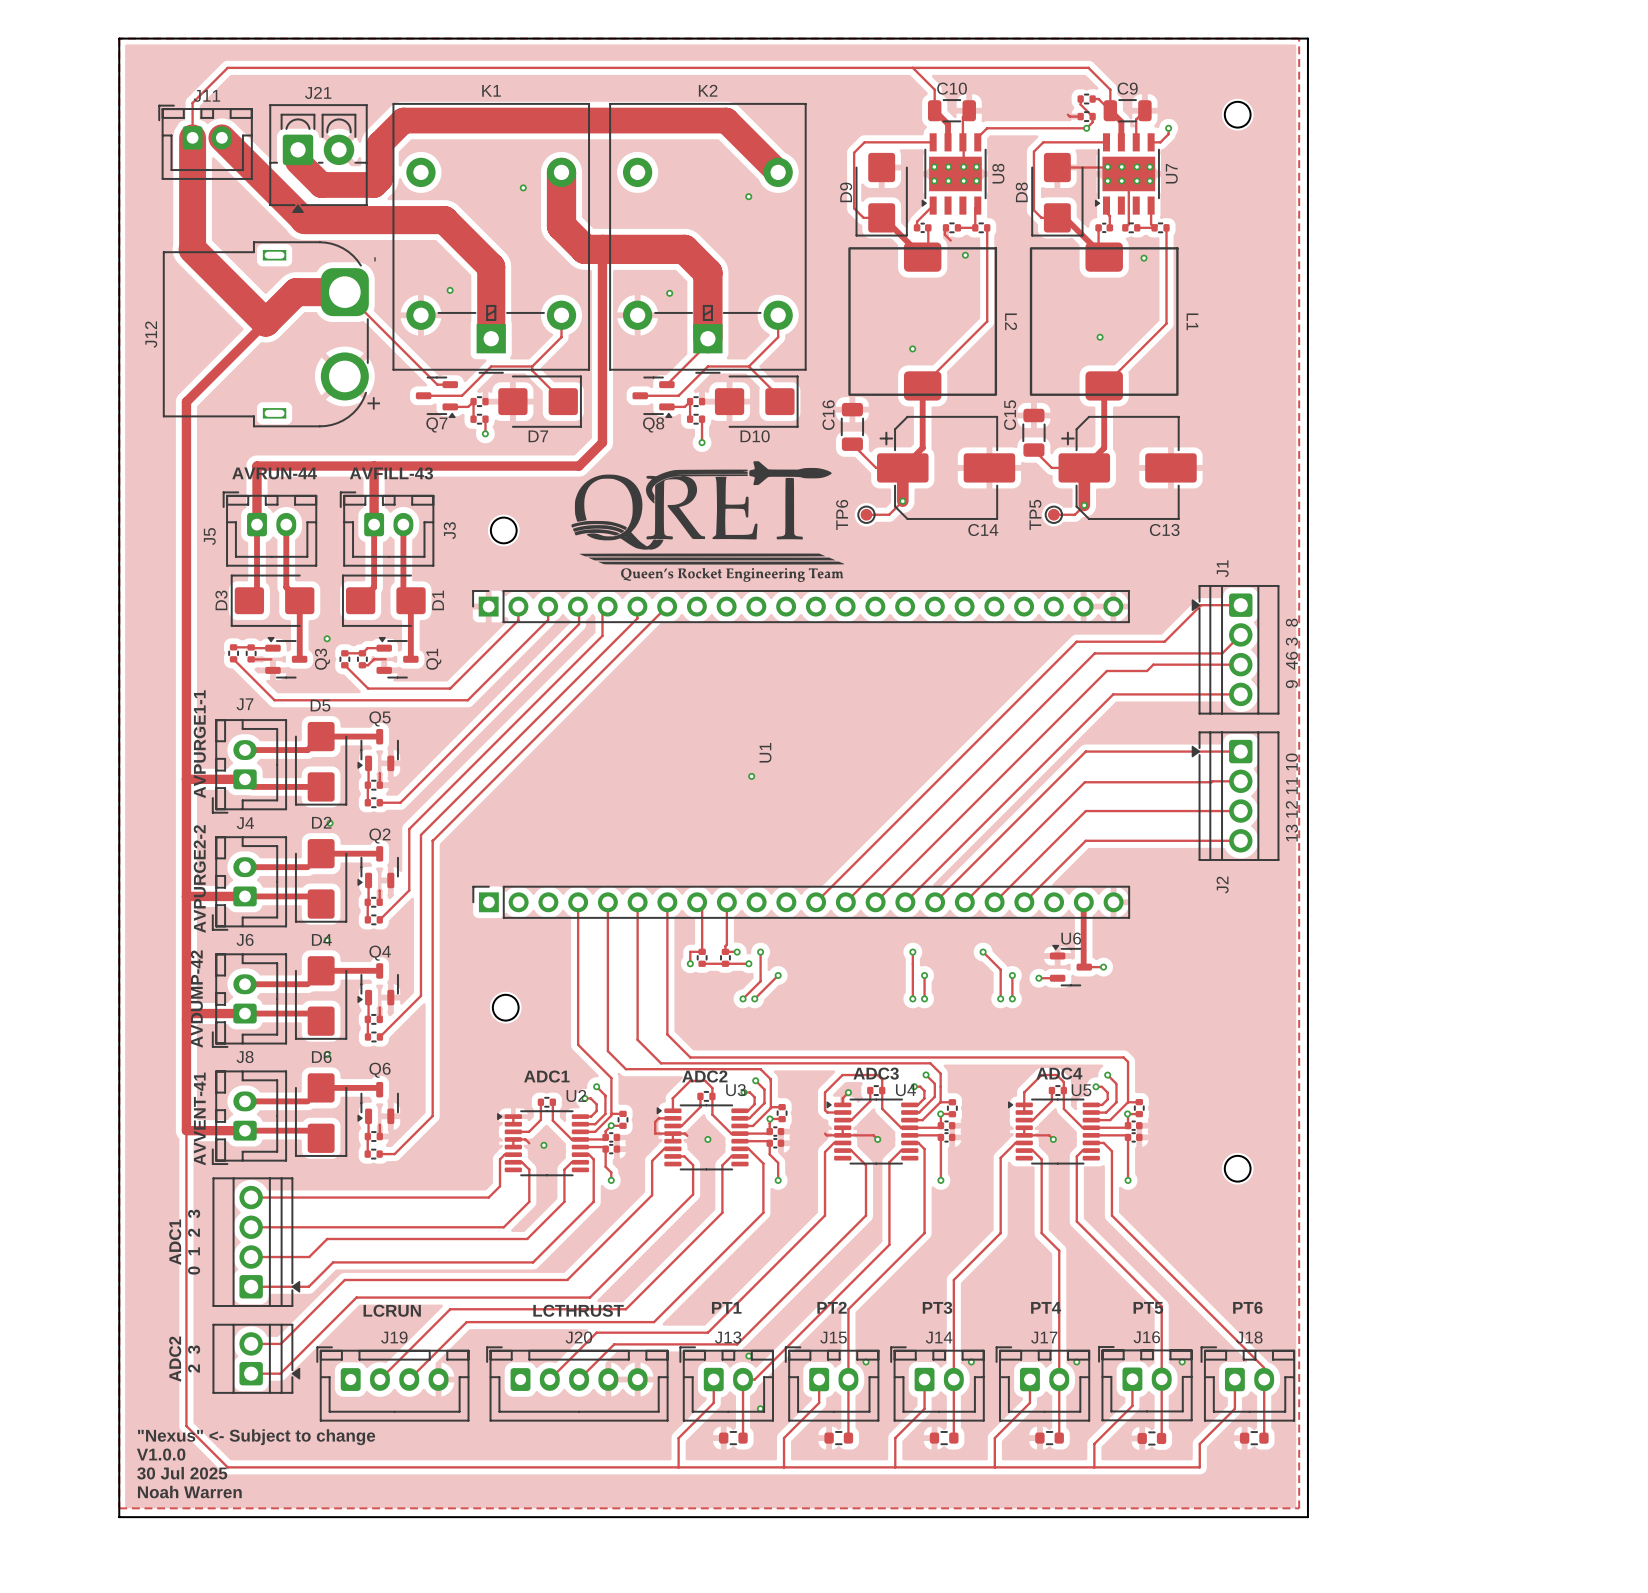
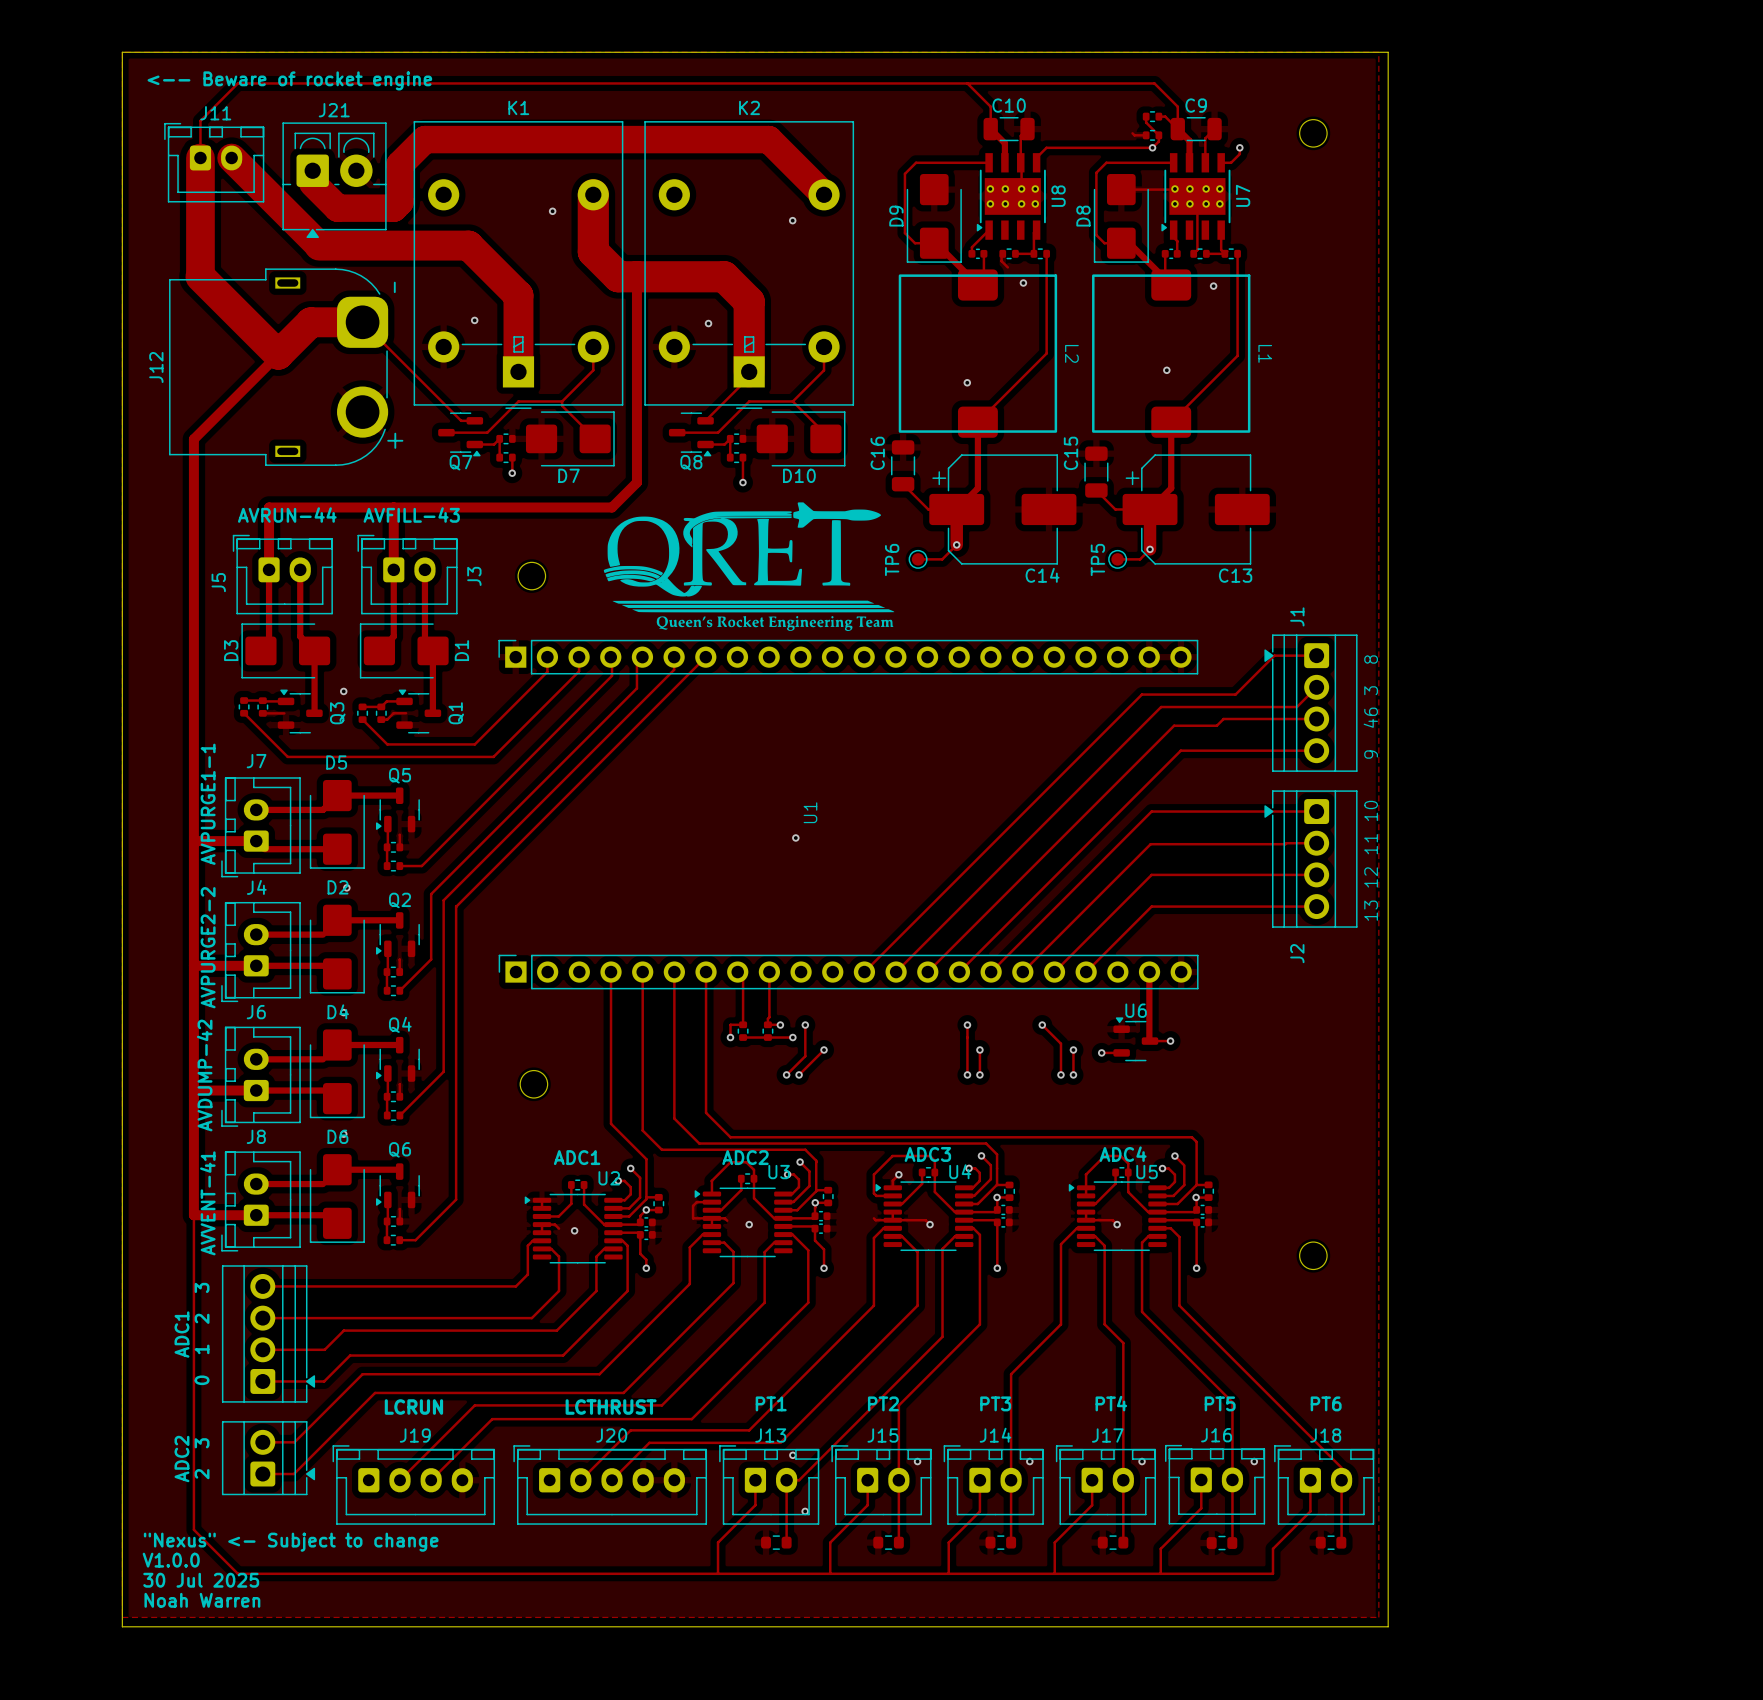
text: none -> <-- Beware of rocket engine (289, 80)

